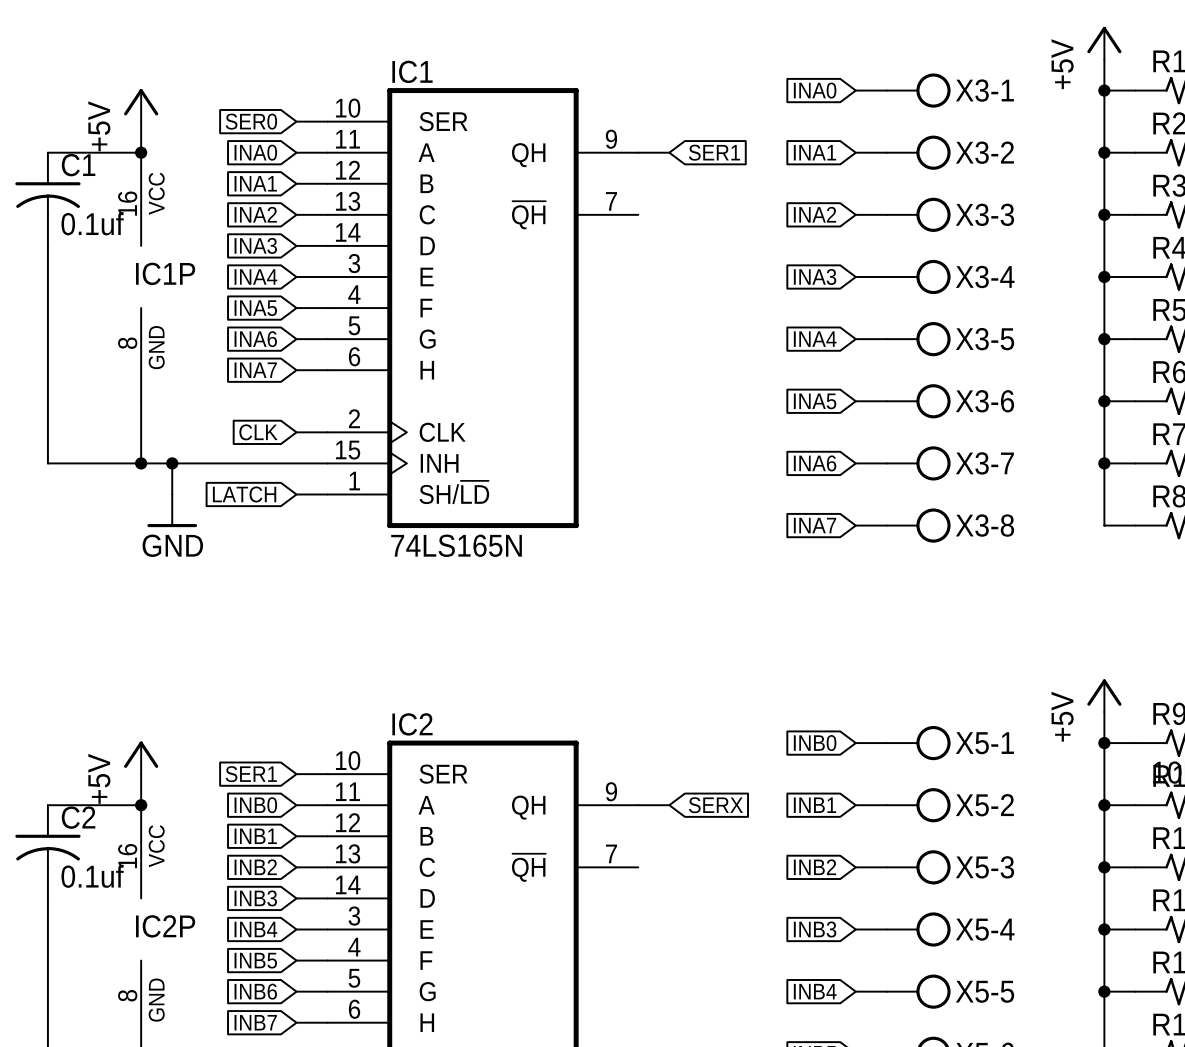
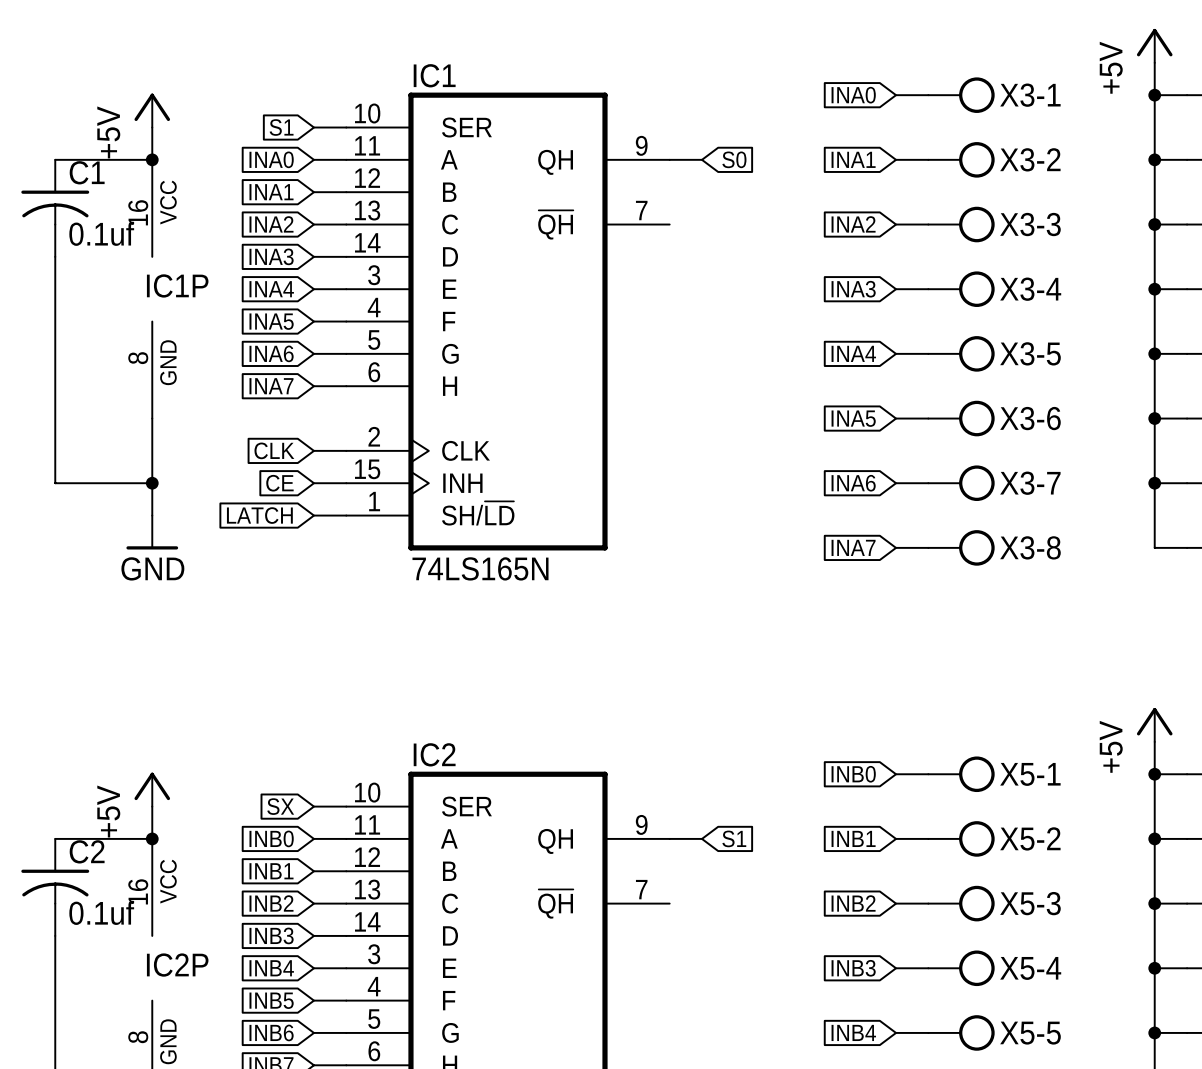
global label: SER0 (251, 121) -> S1 (281, 127)
global label: SER1 (714, 152) -> S0 (734, 159)
wire: (141, 463) (296, 463) -> (152, 483) (152, 515)
wire: (172, 463) (172, 494) -> none
junction: (172, 463) -> none
global label: none -> CE (279, 483)
power symbol position: GND (172, 510) -> GND (152, 532)
global label: SER1 (251, 774) -> SX (280, 806)
global label: SERX (715, 805) -> S1 (734, 838)

